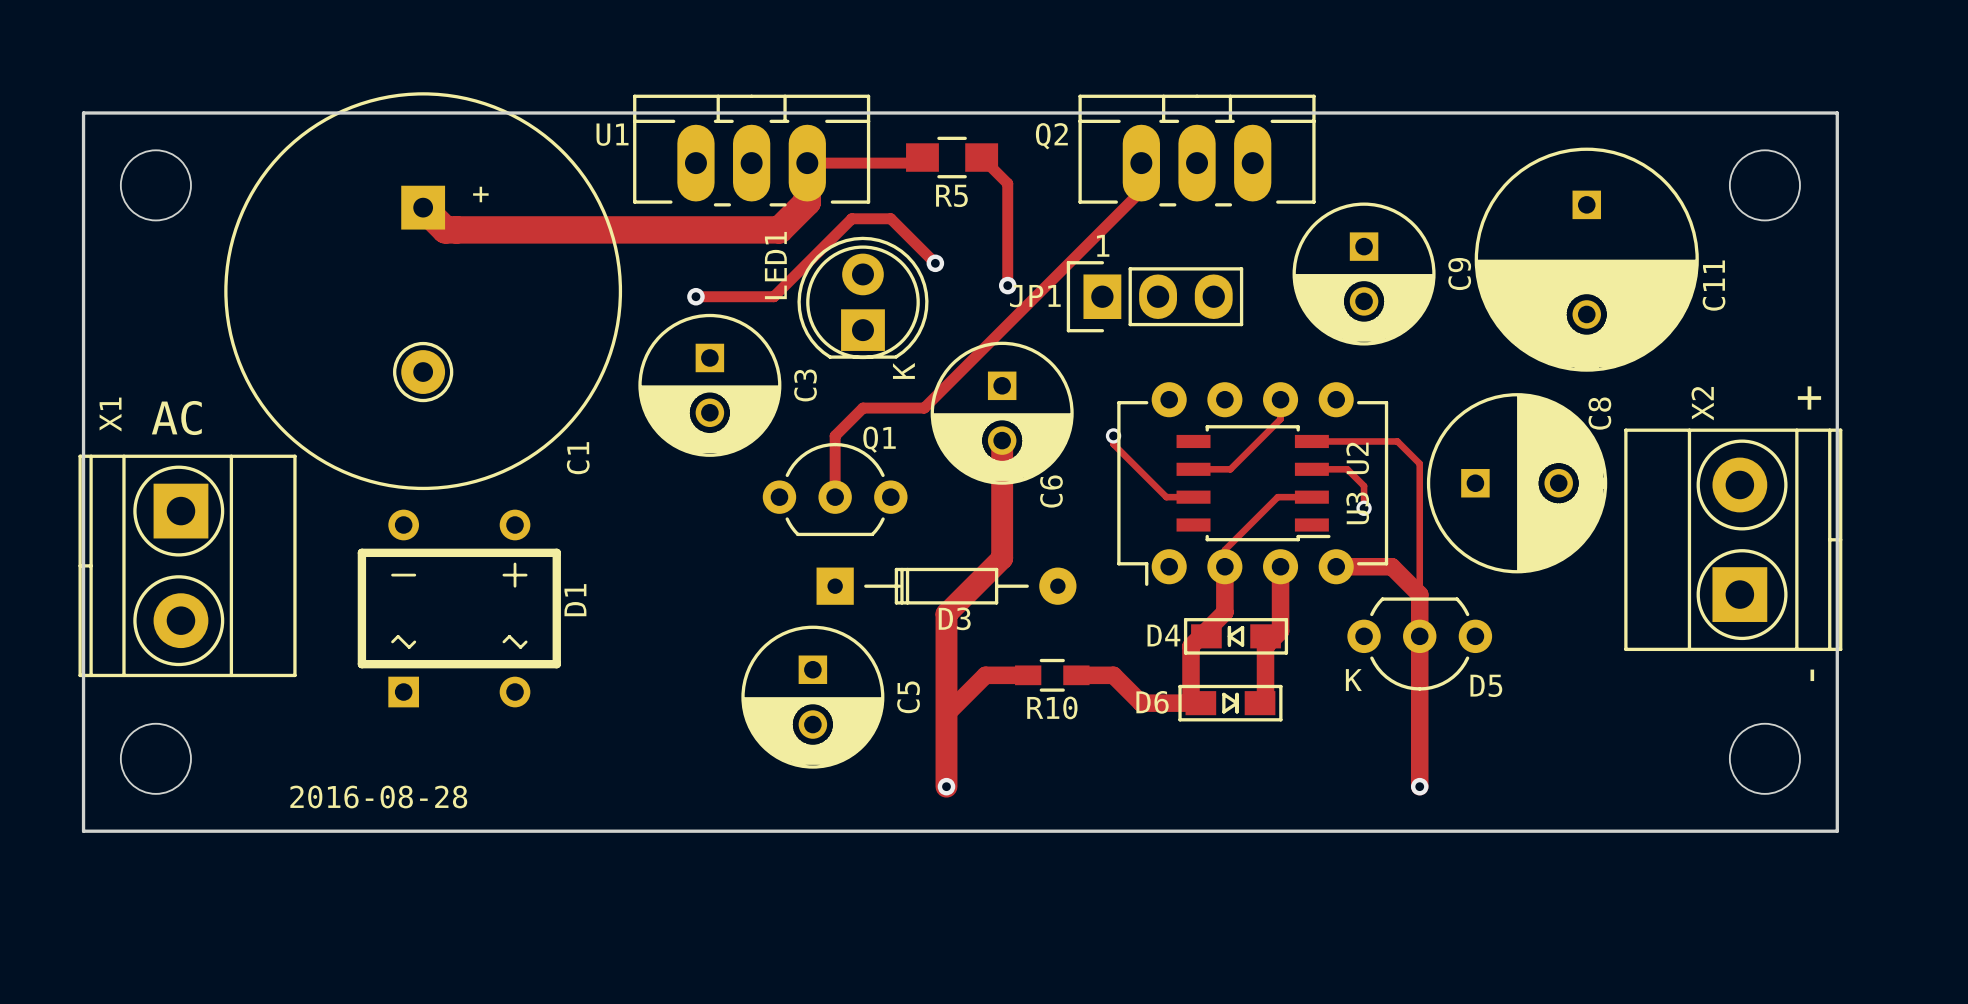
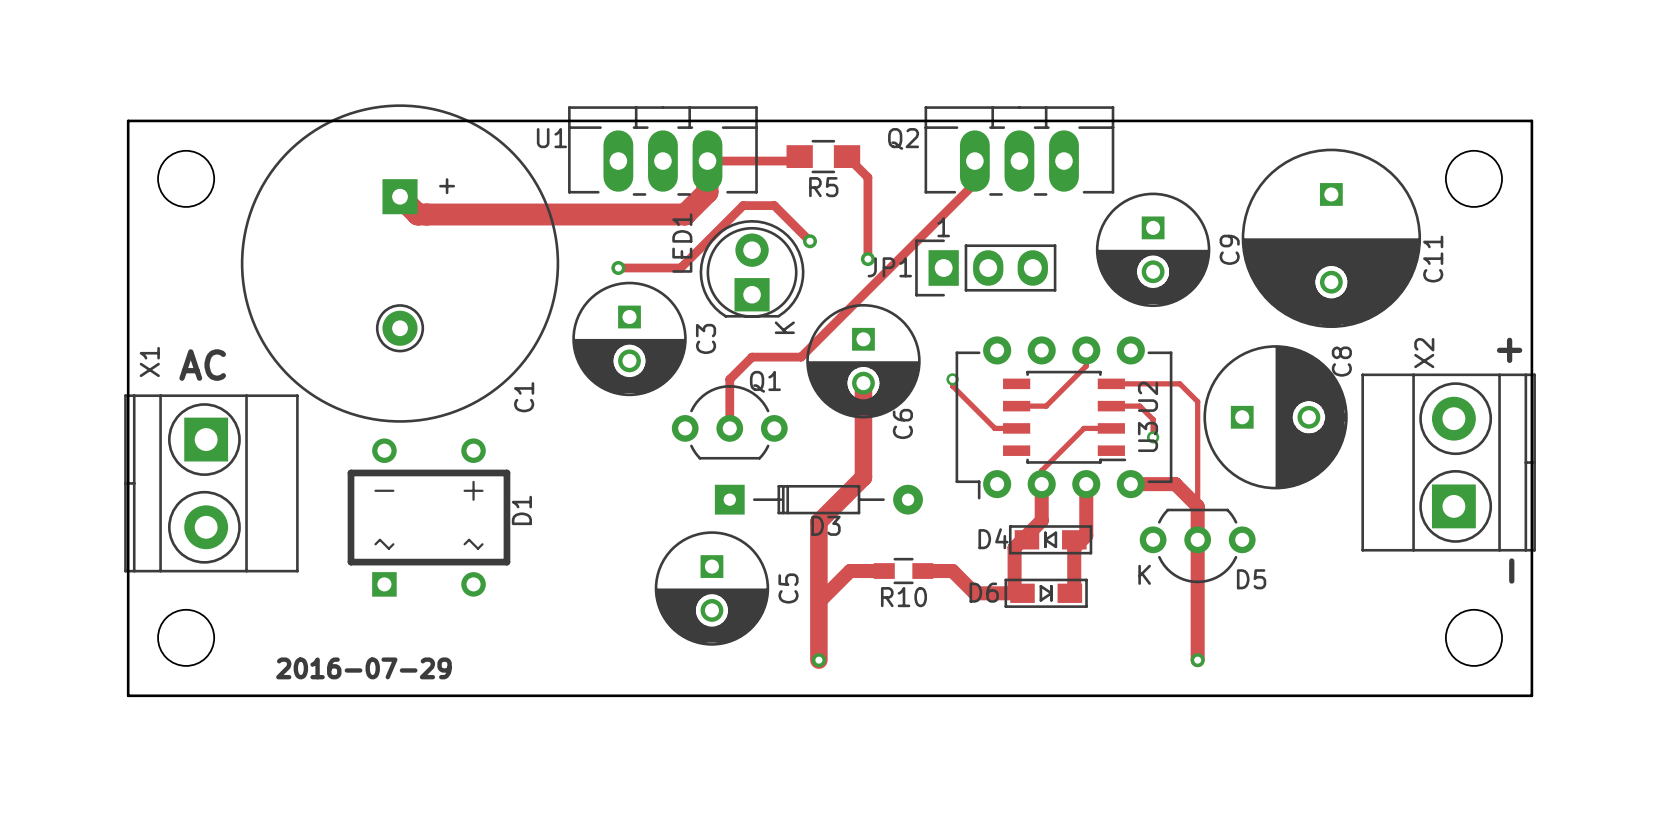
text: 2016-08-28 (378, 797) -> 2016-07-29 (363, 668)

